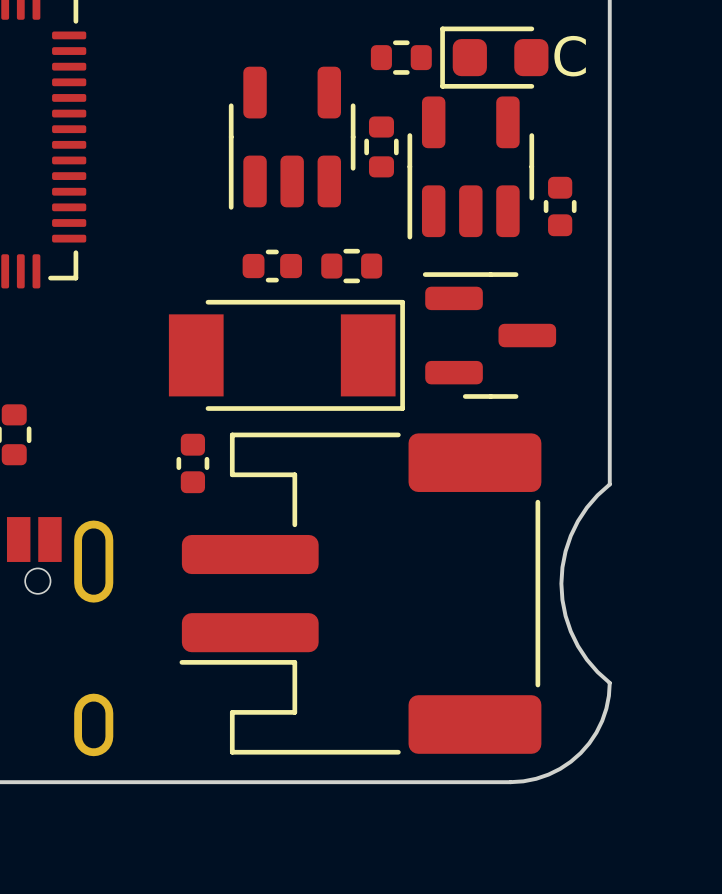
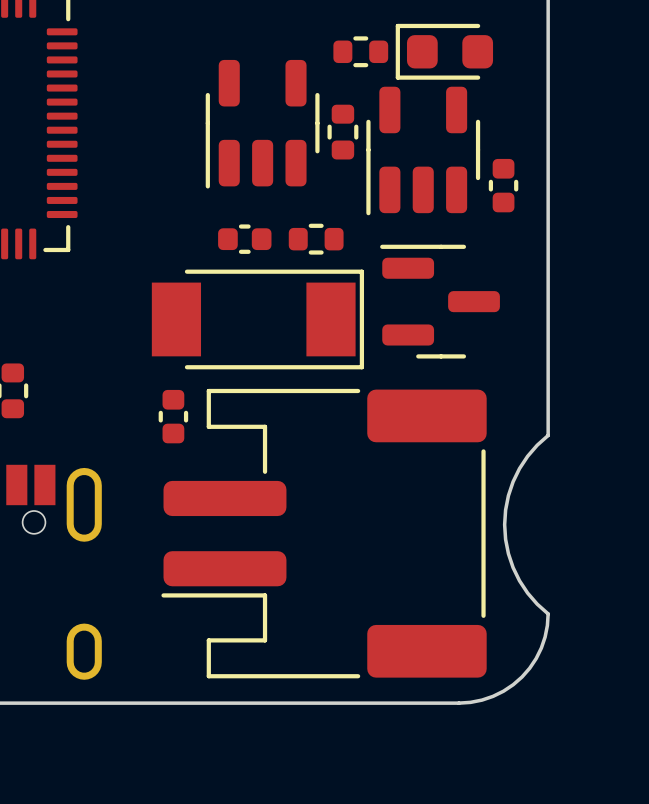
text: C (570, 56) -> none

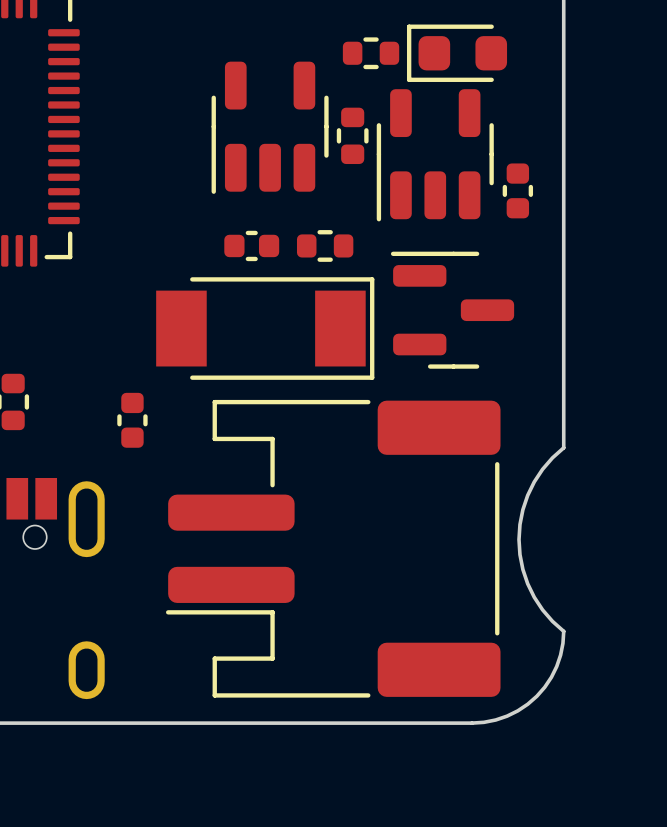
part position: (173, 416) -> (132, 420)

